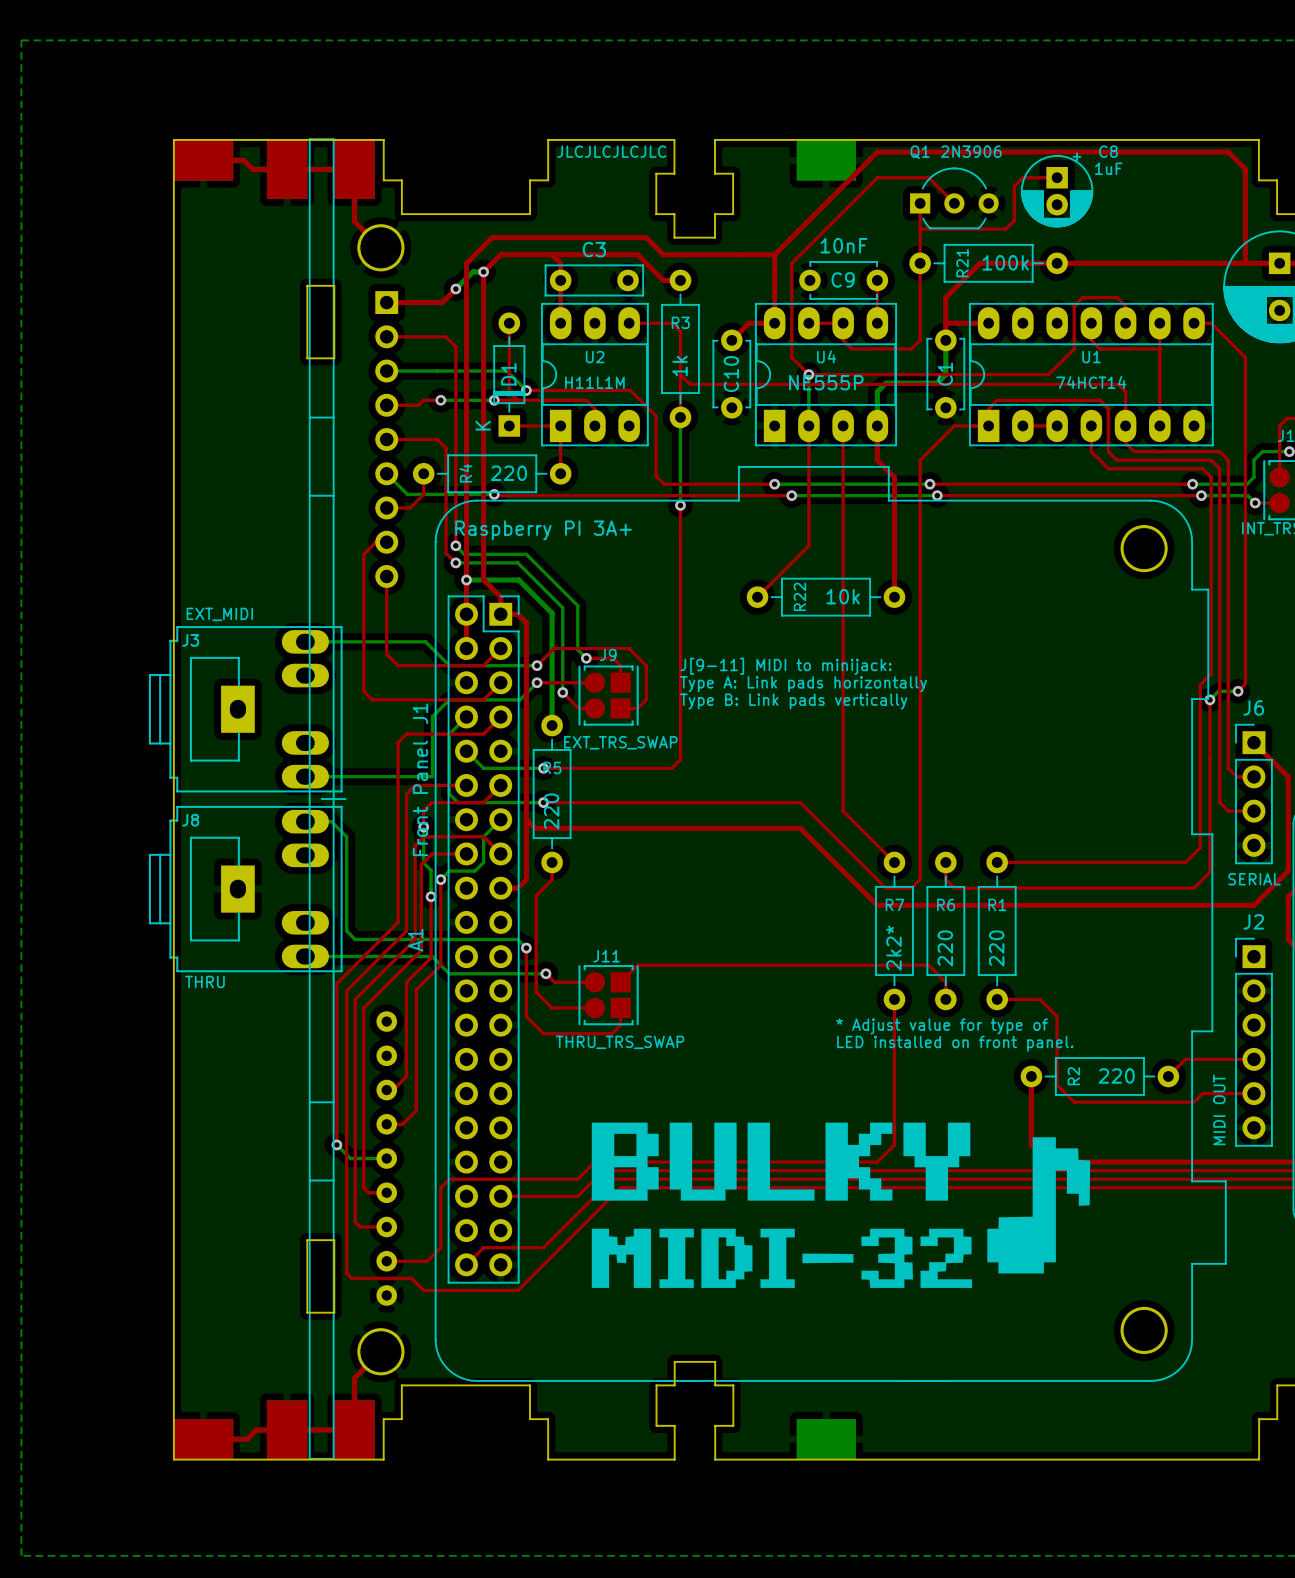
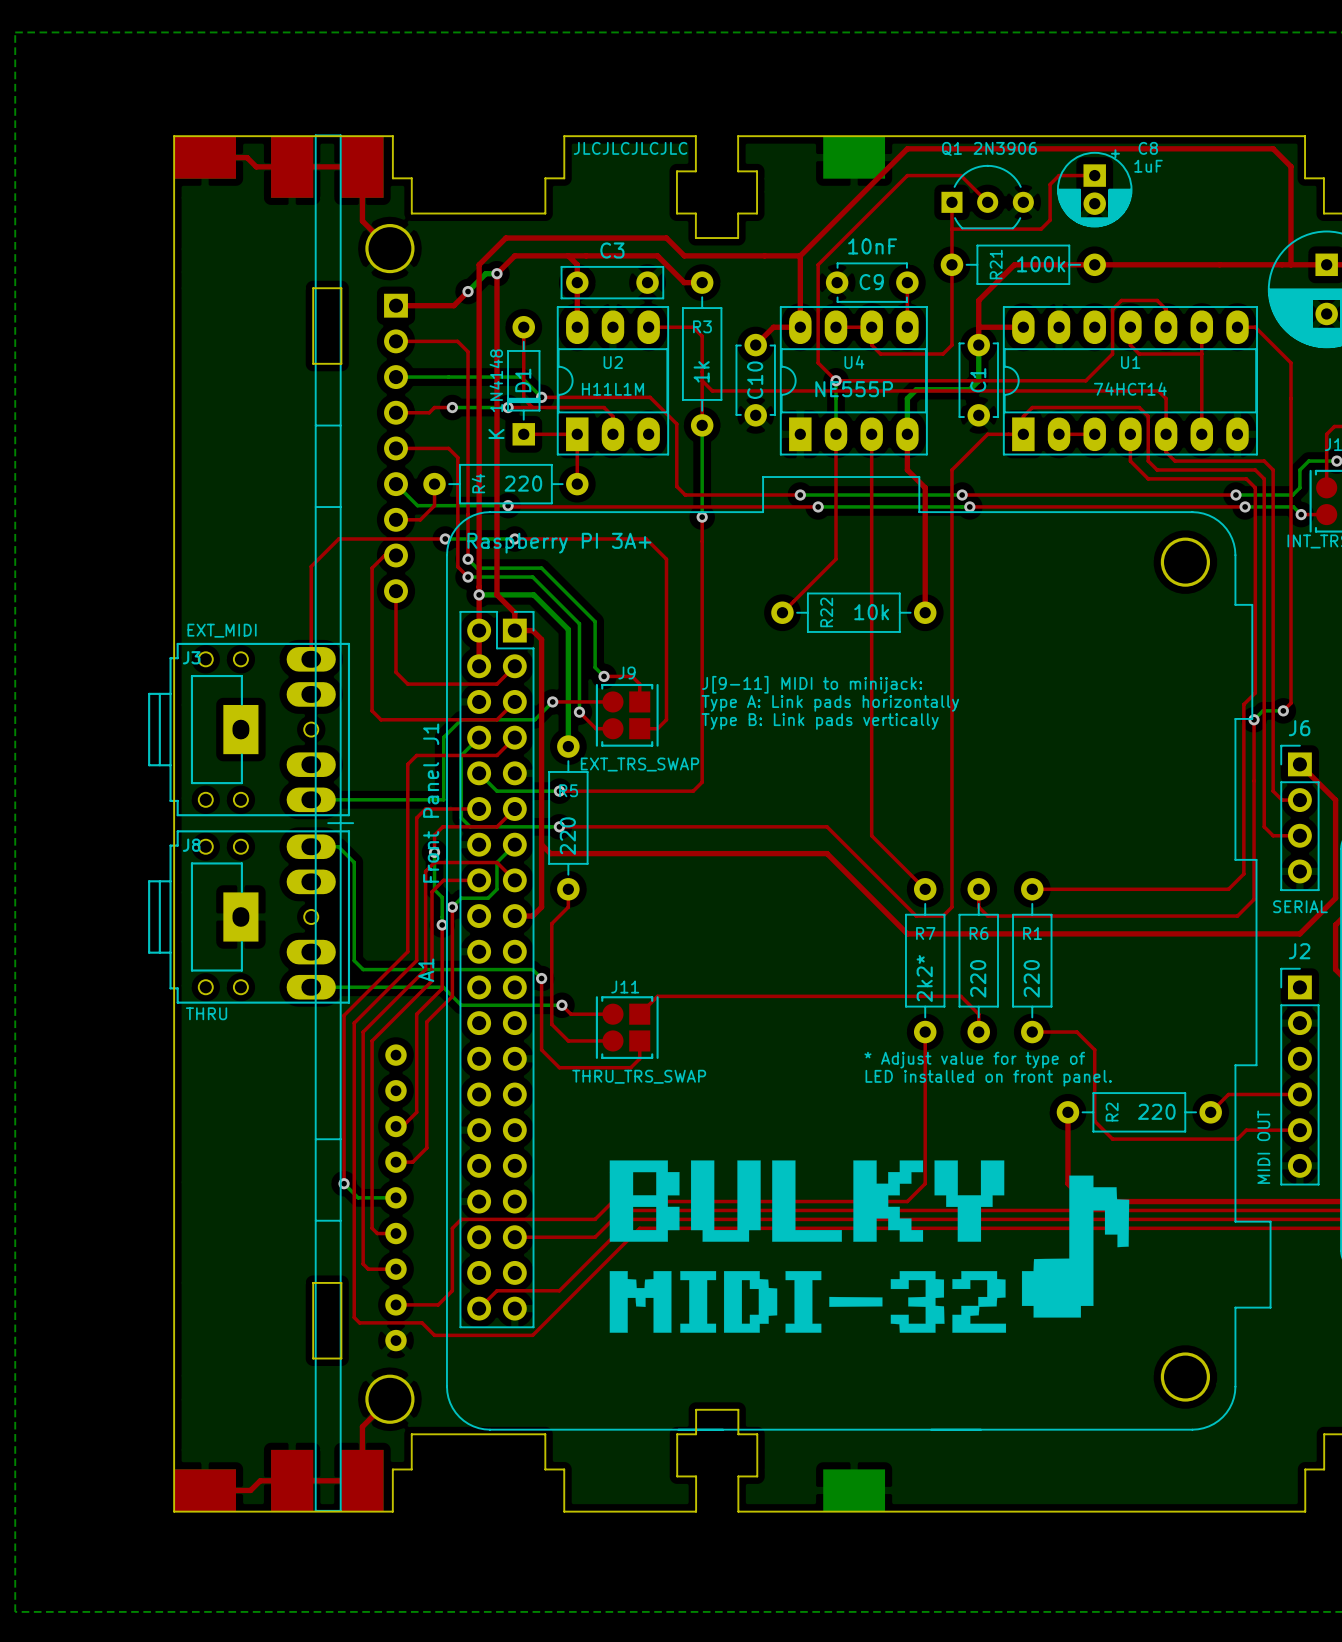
D1 value: none -> 1N4148 (496, 380)
top track: none -> (445, 538) (338, 538) (311, 566) (311, 659)
bottom track: none -> (445, 538) (514, 538)
via: none -> (445, 538)
via: none -> (514, 538)
J3 footprint: [148, 626, 343, 793] -> [148, 642, 351, 817]
bottom track: (305, 641) (425, 641) (449, 665) (537, 665) -> none
top track: (537, 665) (554, 648) (629, 648) (646, 665) -> (514, 538) (646, 538) (666, 559) (666, 684)
via: (537, 665) -> none
J8 footprint: [148, 805, 343, 973] -> [148, 830, 351, 1004]

